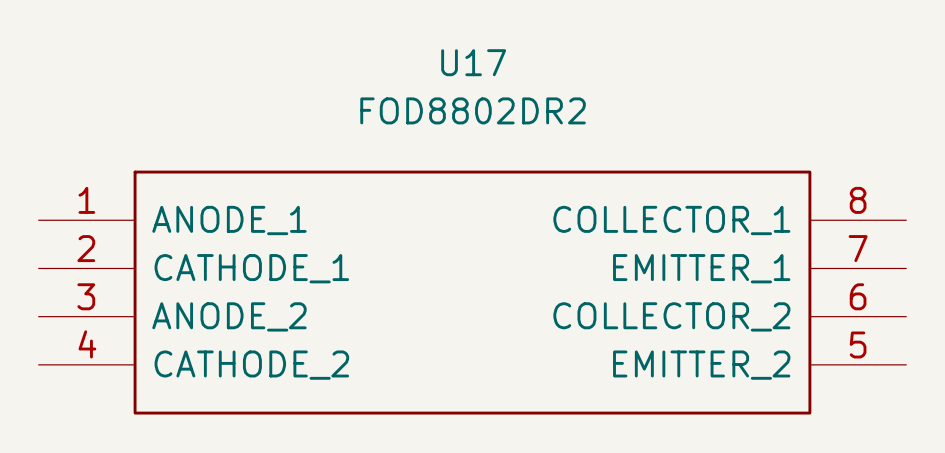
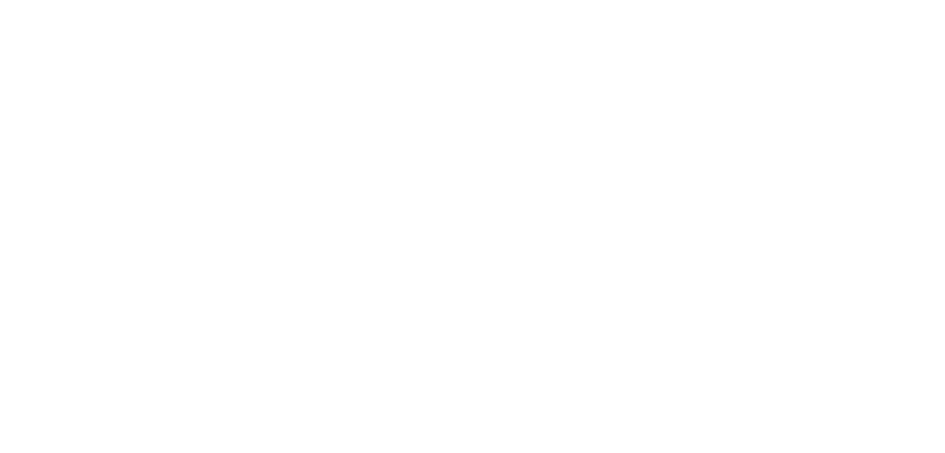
U17: FOD8802DR2 (472, 292) -> none

